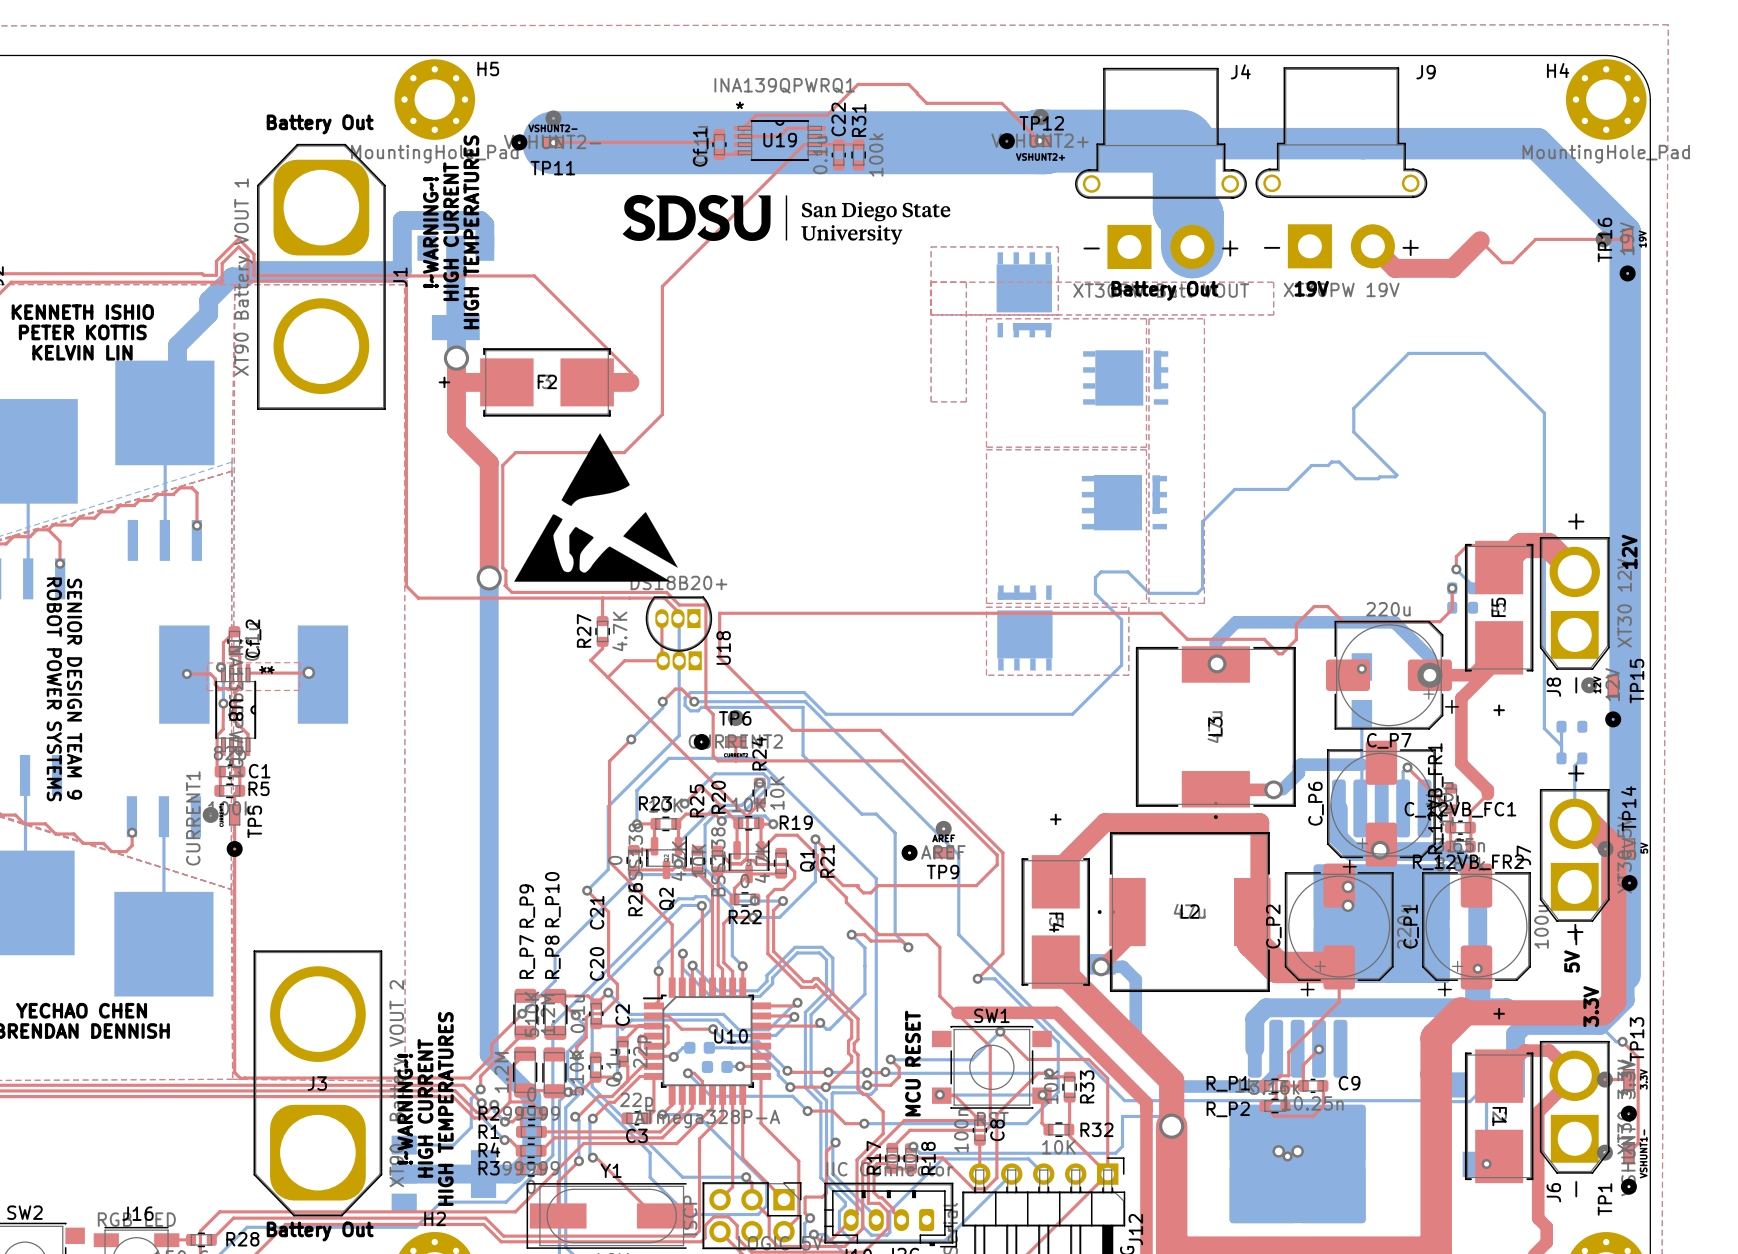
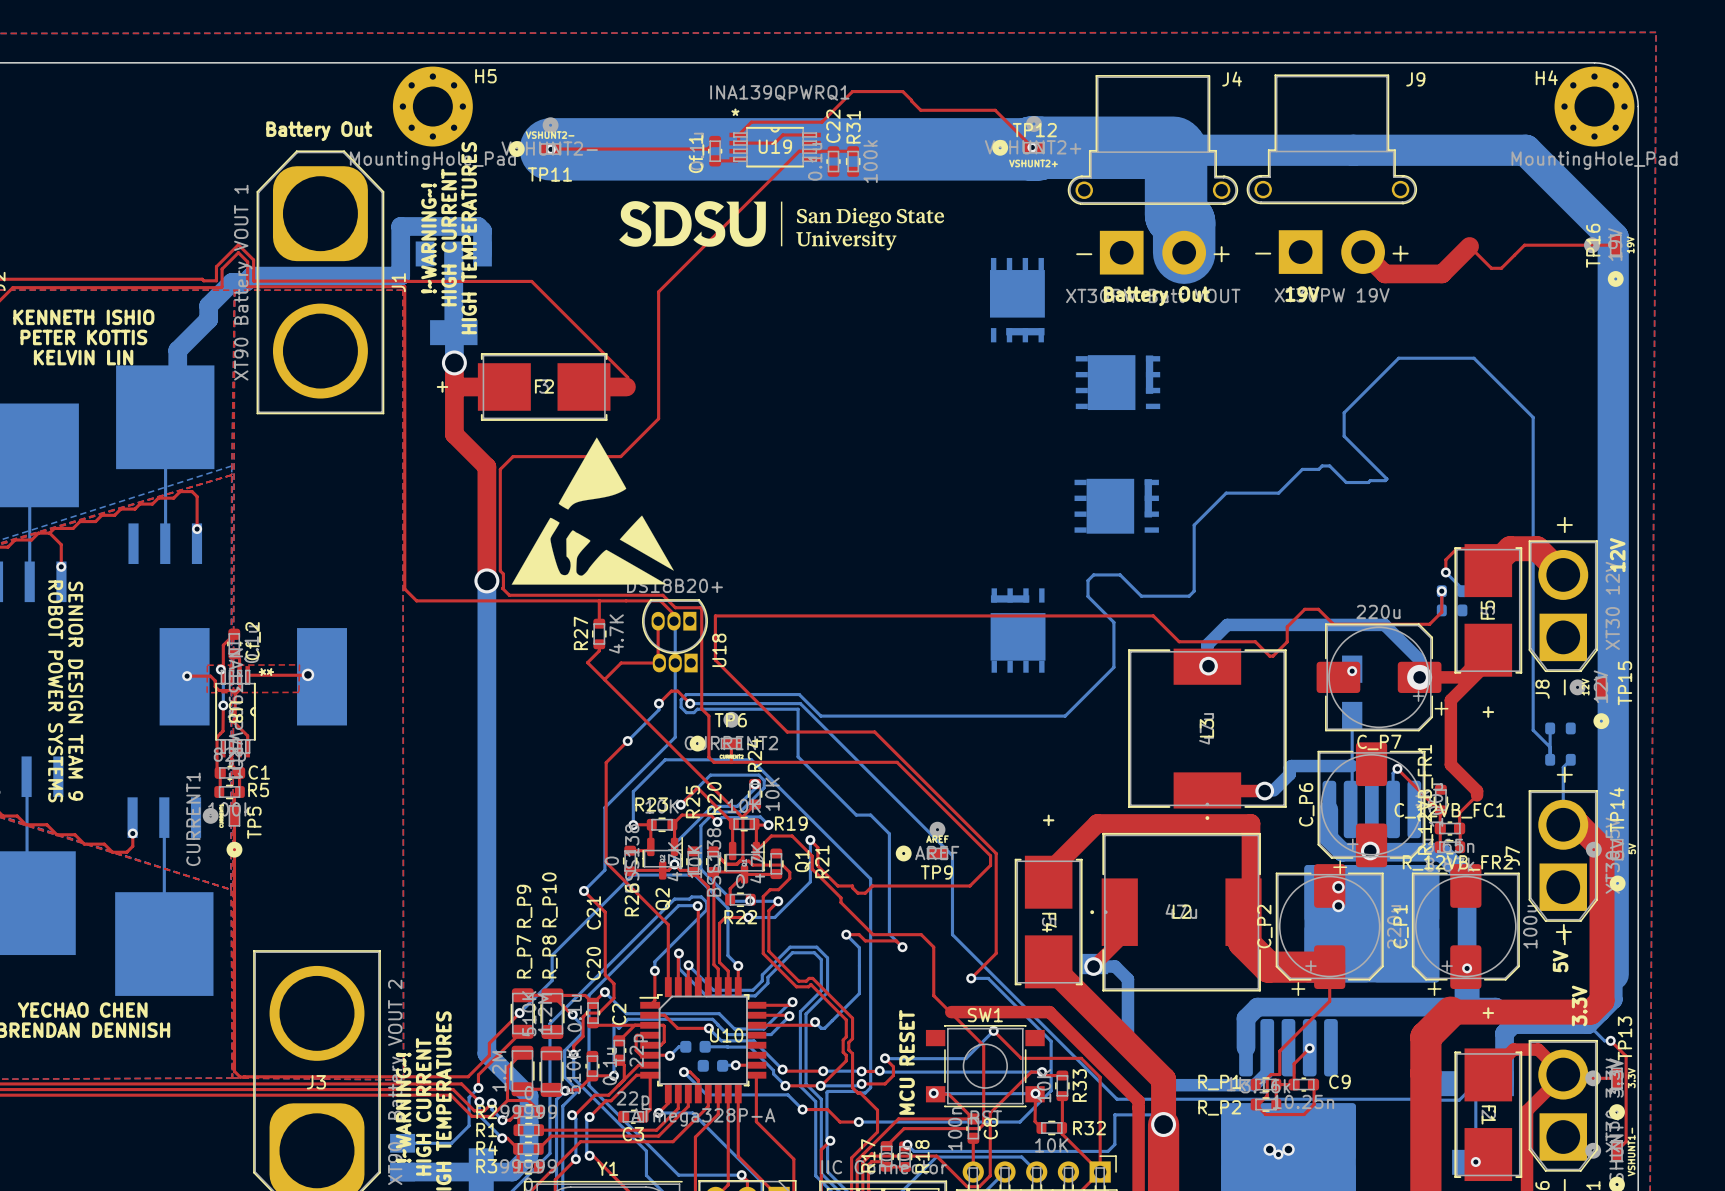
top zone outline: (931, 282) (1273, 282) (1273, 314) (931, 314) -> none
top zone outline: (966, 282) (966, 401) (931, 401) (931, 246) (1058, 246) (1058, 314) -> none
top zone outline: (986, 318) (986, 447) (1146, 447) (1146, 318) (986, 318) -> none
top zone outline: (1148, 318) (1204, 318) (1204, 603) (1148, 603) (1148, 318) -> none
top zone outline: (986, 449) (986, 603) (1146, 603) (1146, 449) (986, 449) -> none
top zone outline: (986, 607) (1128, 607) (1128, 675) (986, 675) (986, 607) -> none

